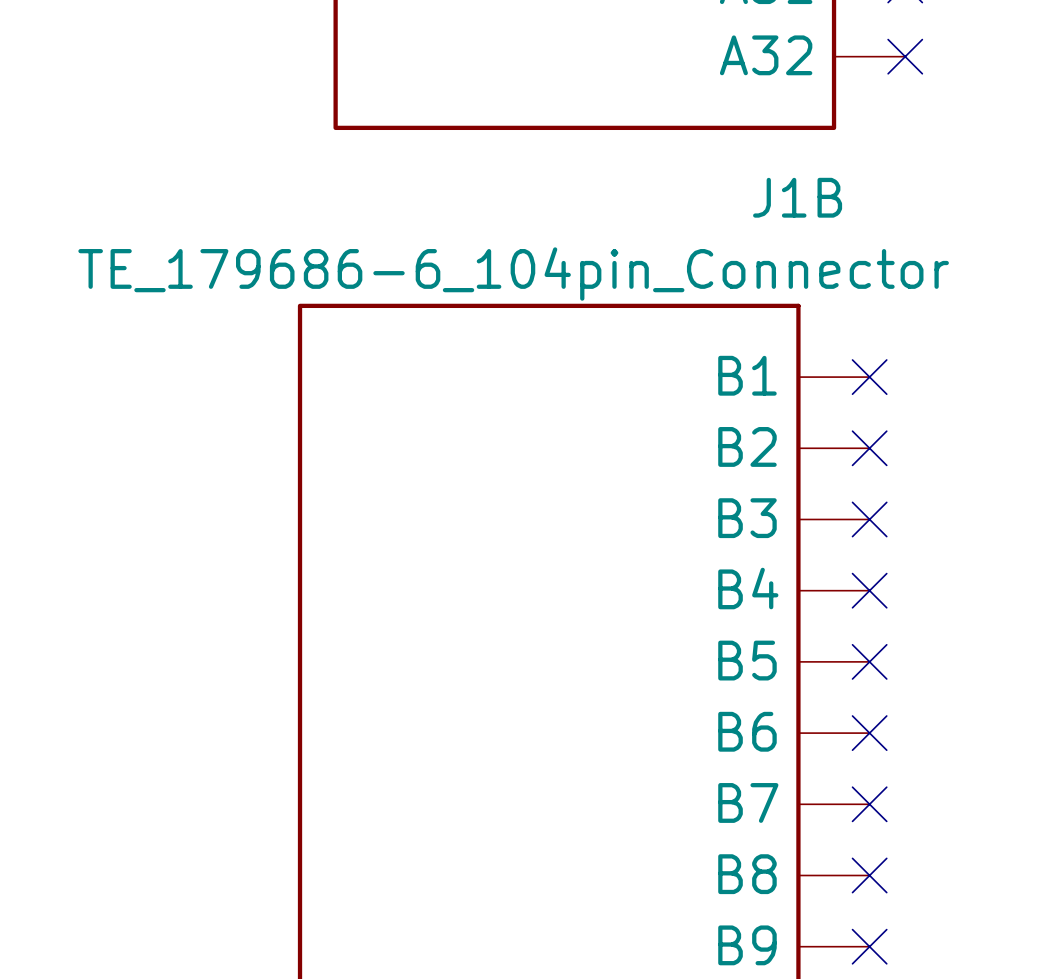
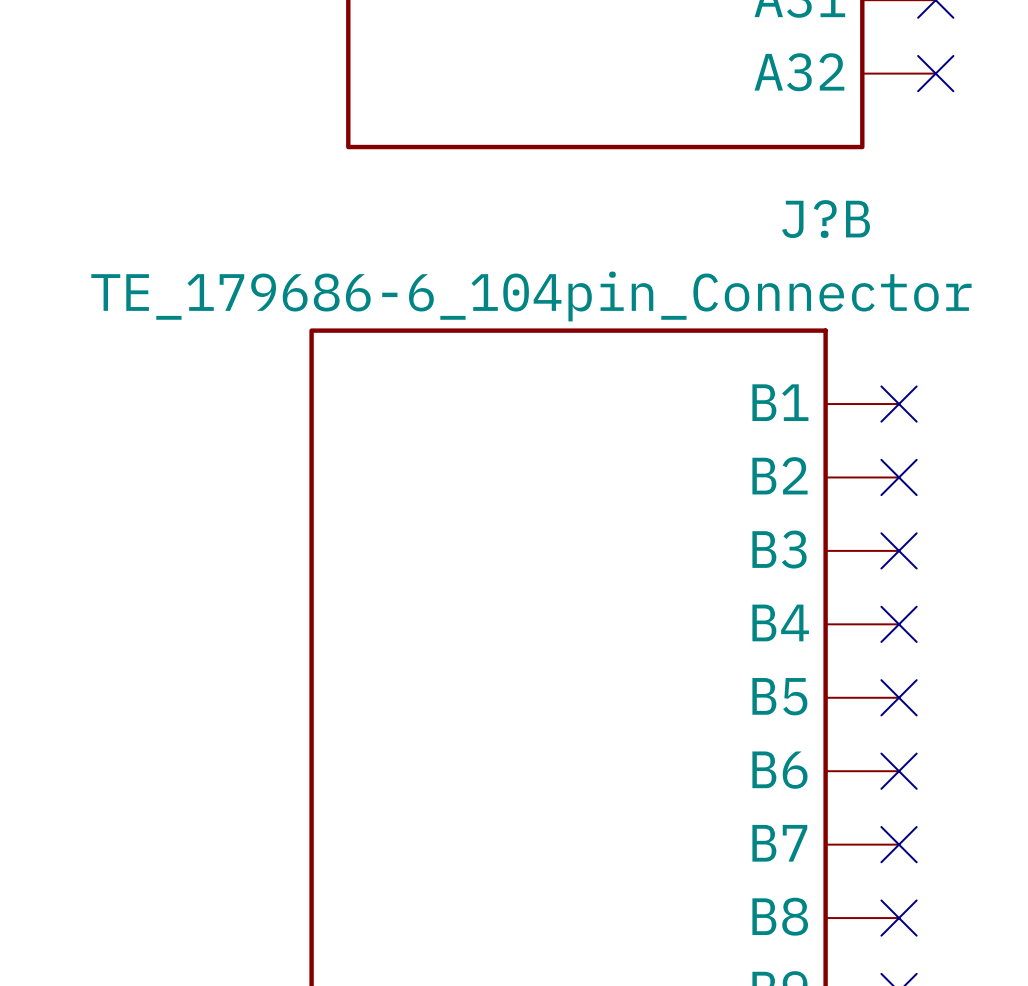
J1B name: J1B (797, 197) -> J?B (826, 219)

